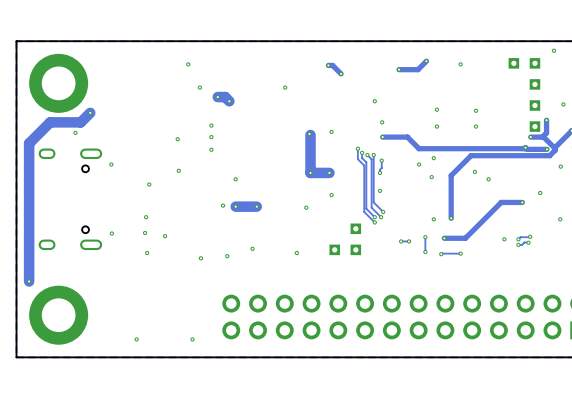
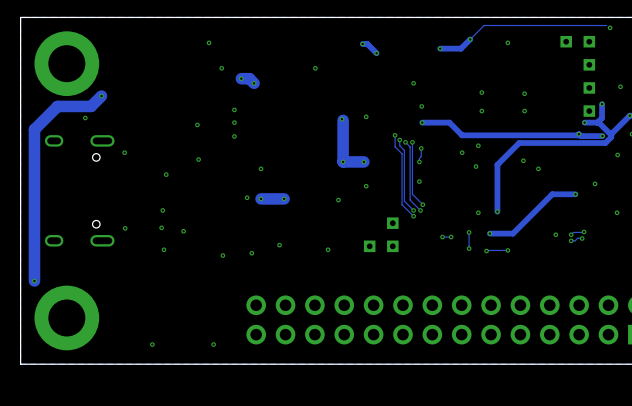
track: none -> (606, 25) (484, 25) (470, 39)

